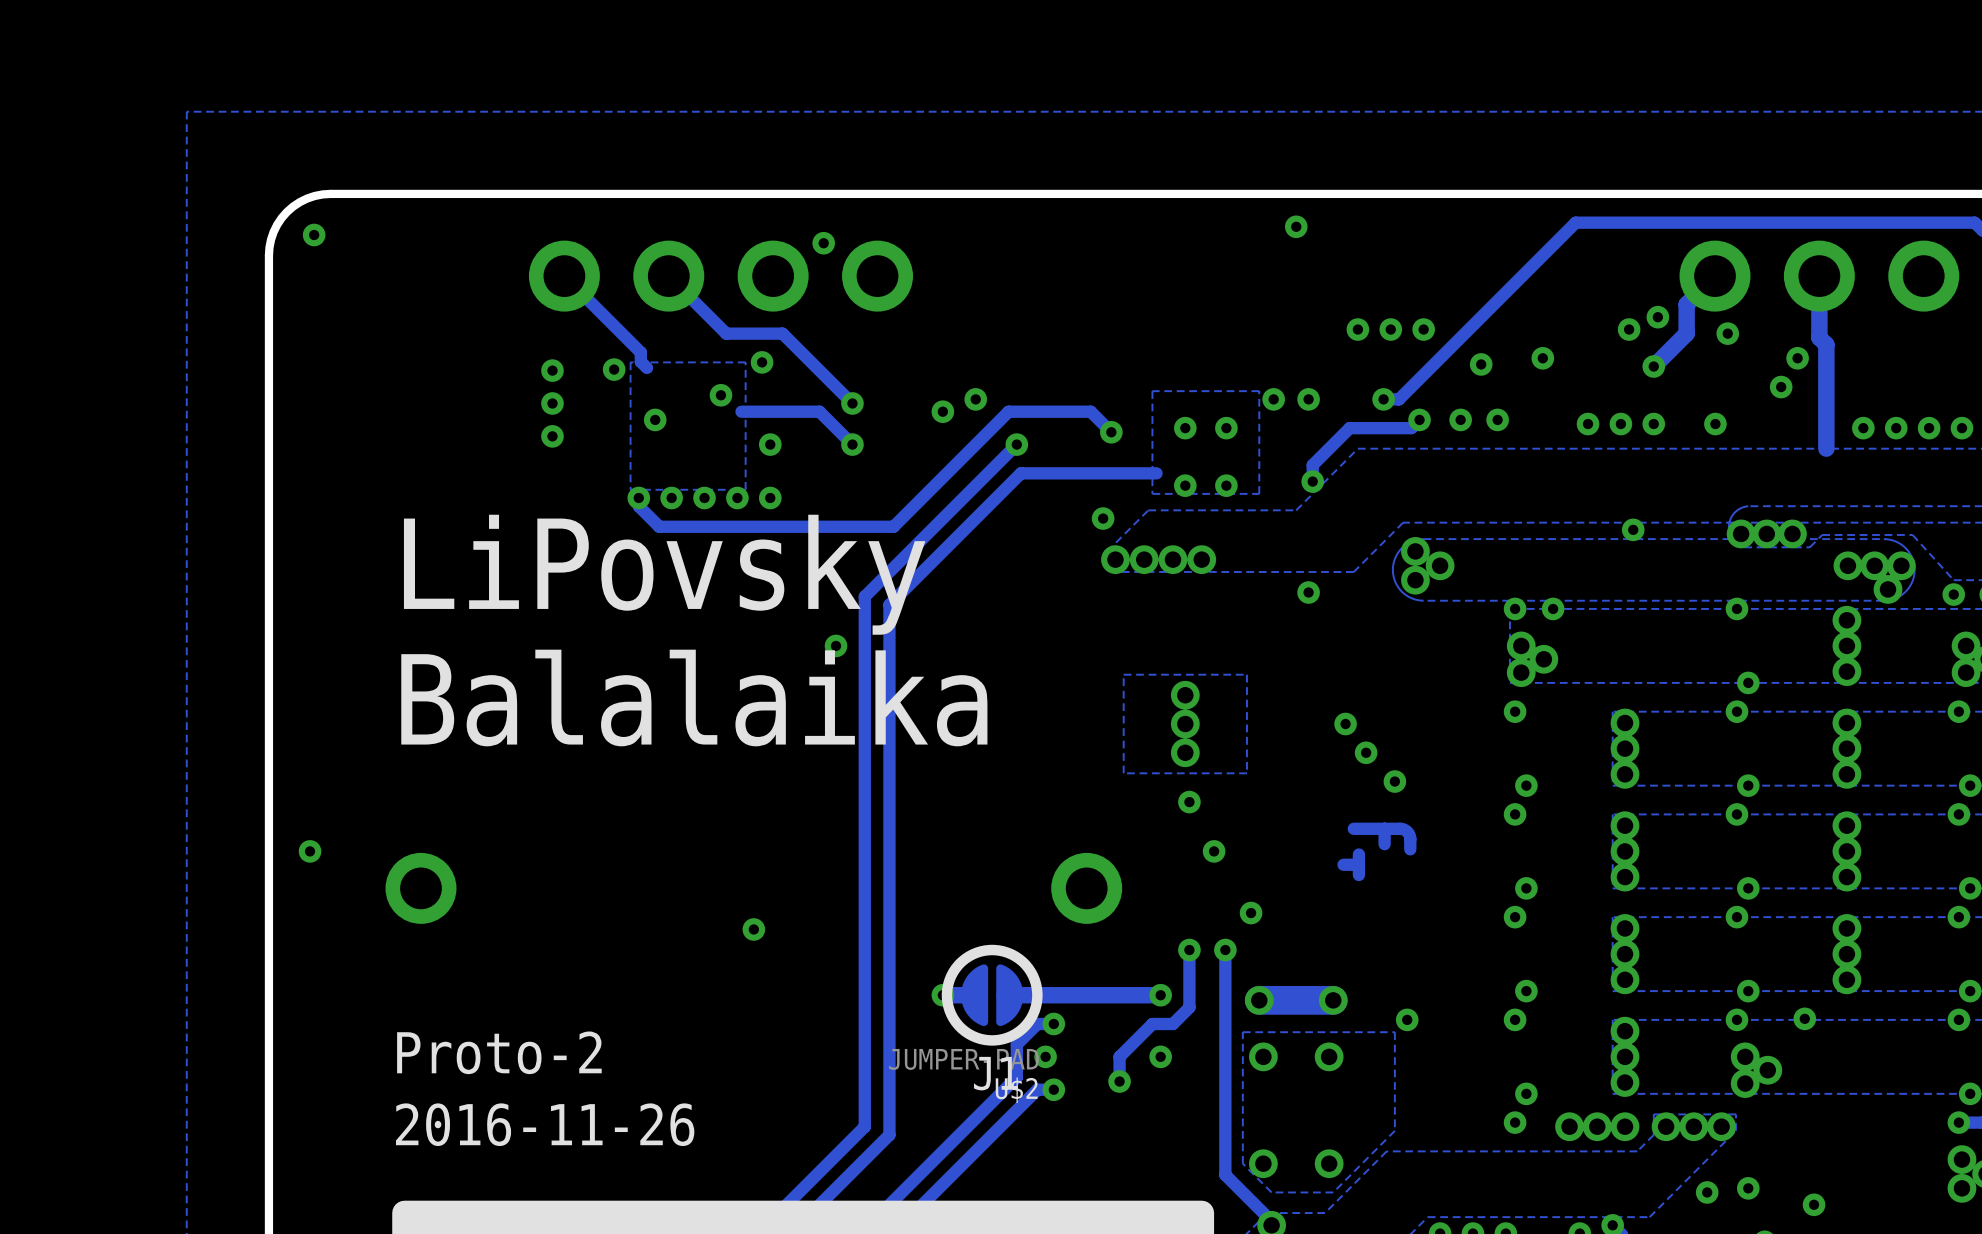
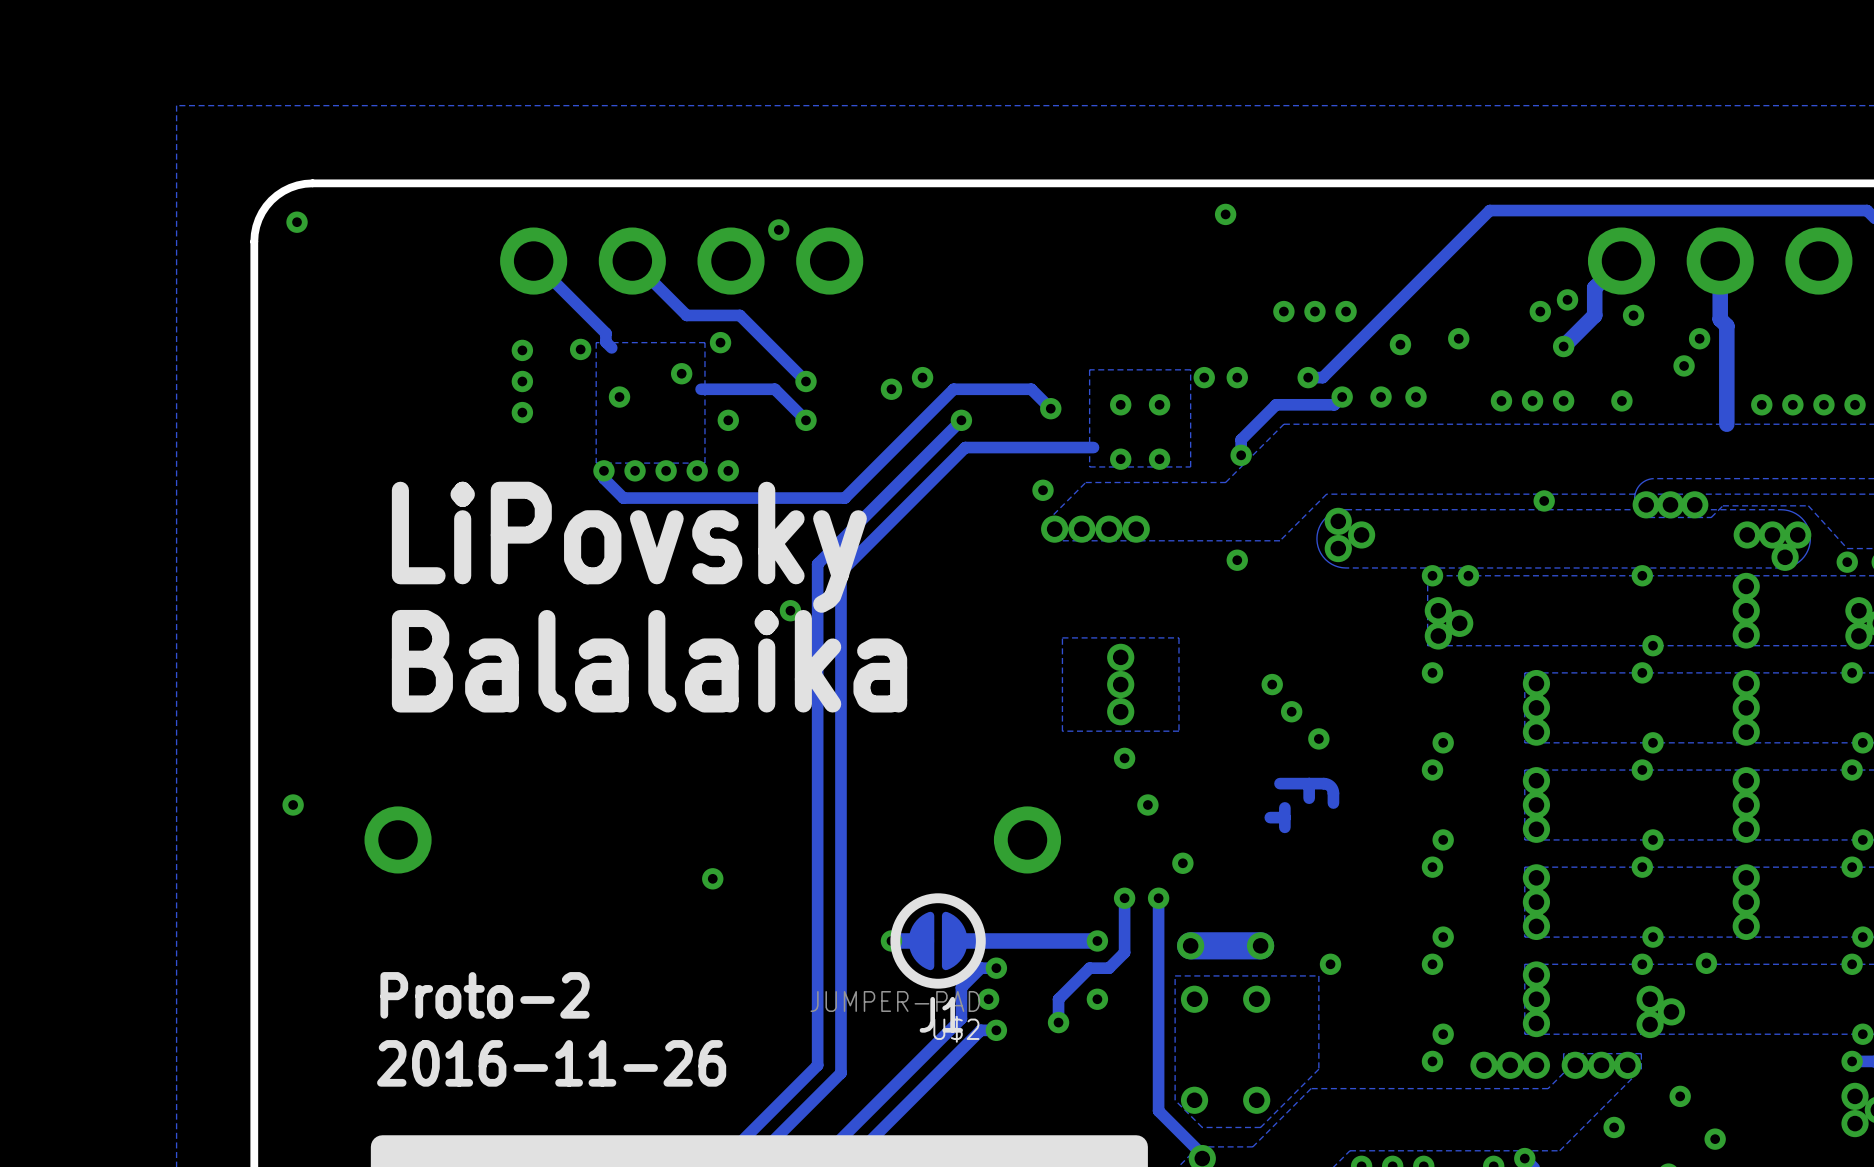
via position: (1748, 1188) -> (1680, 1096)

